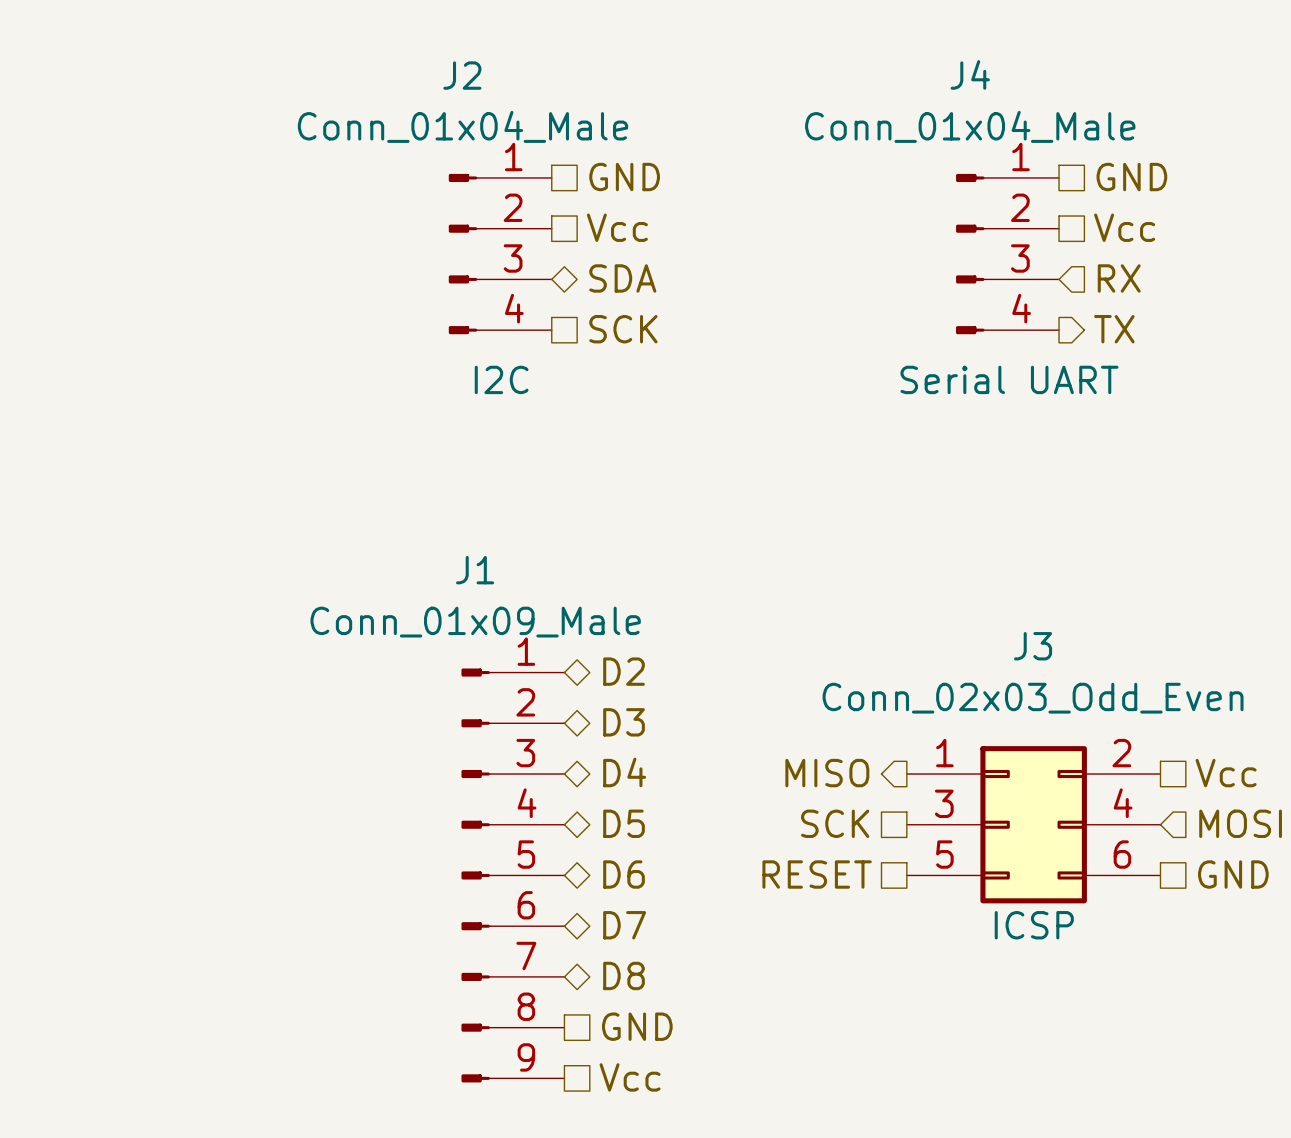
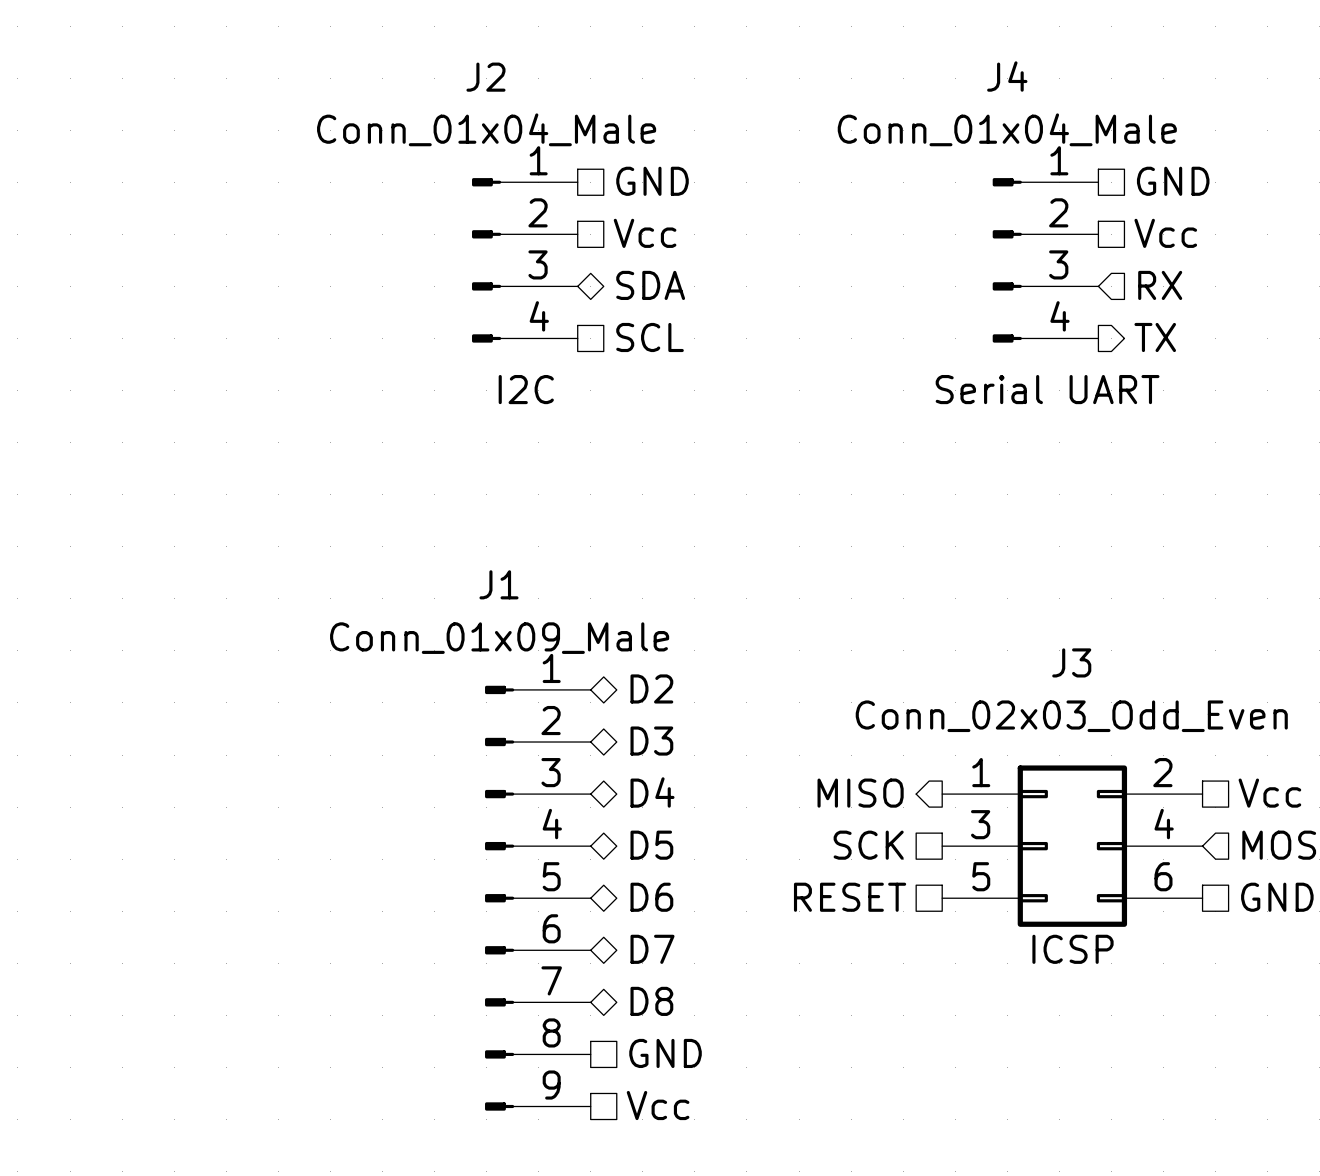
hierarchical label: SCK (623, 329) -> SCL (650, 337)

